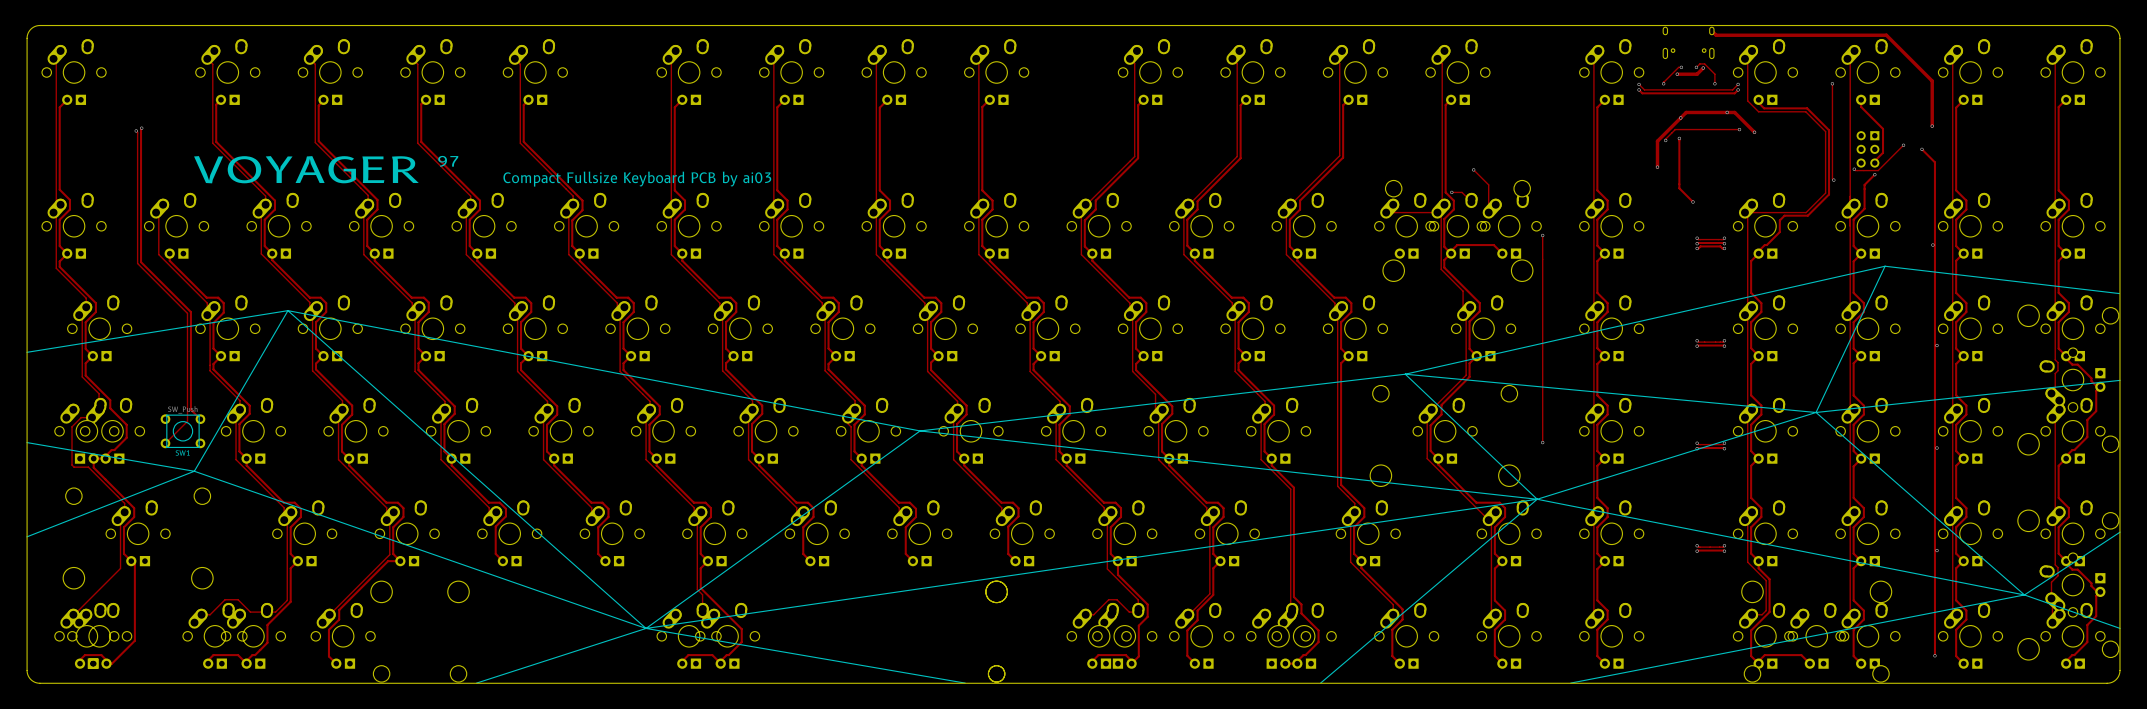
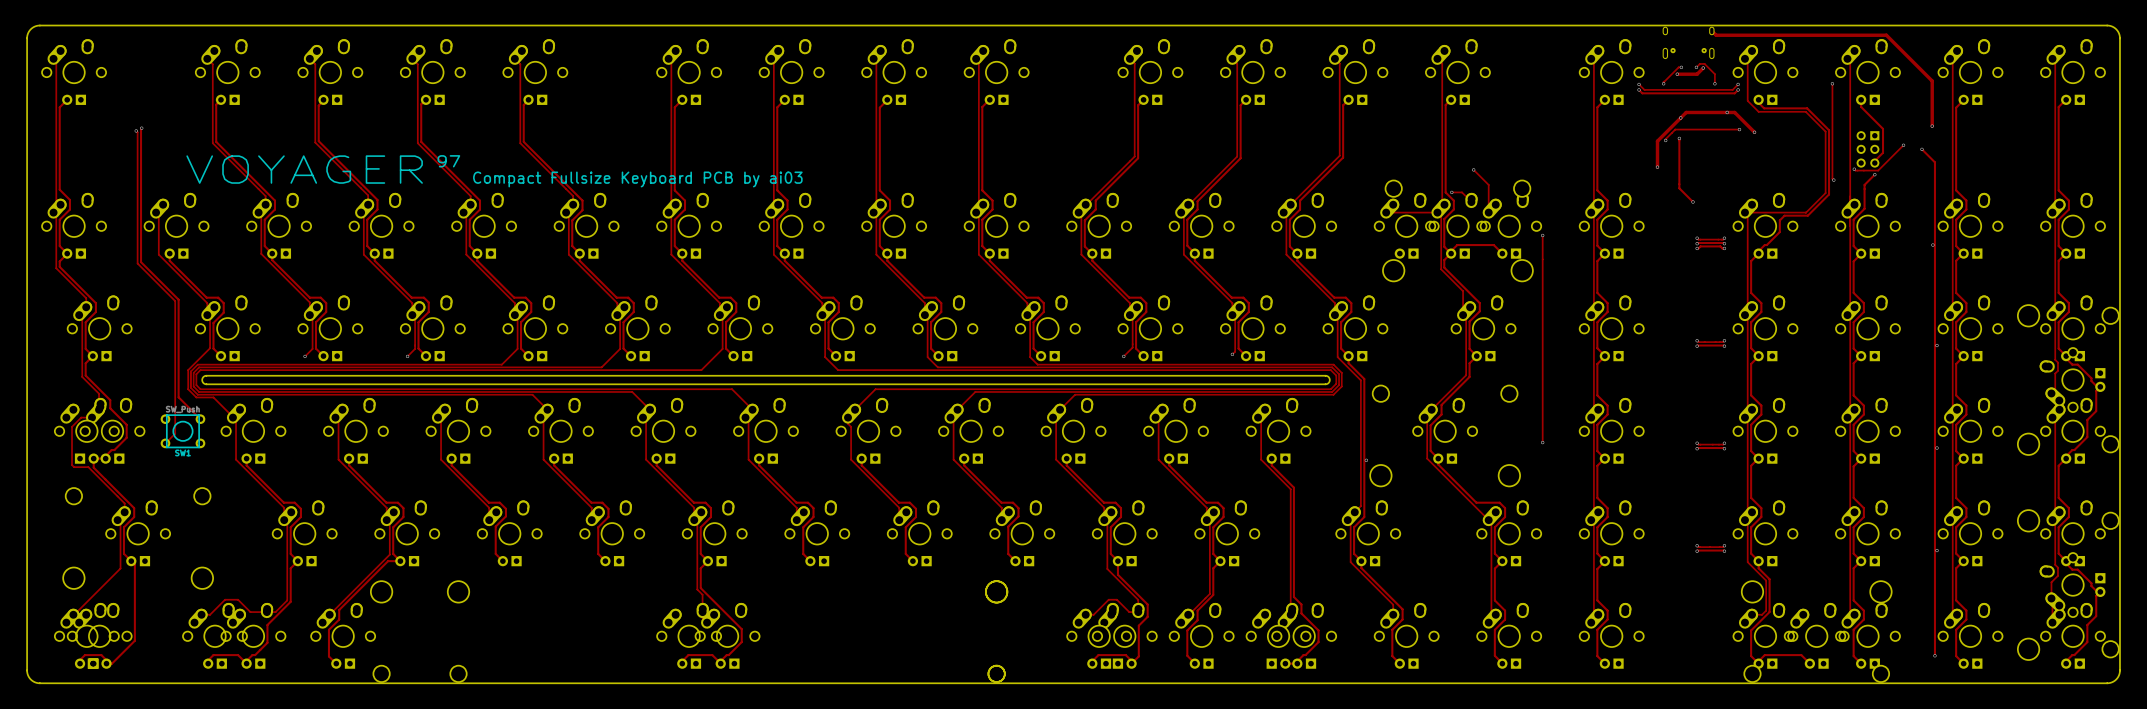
line: (1885, 266) (1816, 412) -> none
line: (1885, 266) (2119, 293) -> none
line: (1885, 266) (1405, 374) -> none
track: (178, 299) (190, 312) (190, 371) -> (178, 299) (178, 397) (200, 419)
track: (175, 301) (187, 313) (187, 421) (175, 433) -> (175, 301) (175, 433)
line: (287, 310) (920, 430) -> none
line: (287, 310) (646, 628) -> none
line: (287, 310) (194, 471) -> none
line: (287, 310) (26, 352) -> none
track: (1132, 347) (1132, 371) (1155, 394) (1155, 417) -> (1132, 347) (1123, 356)
track: (210, 348) (210, 370) (239, 400) (239, 409) -> (210, 348) (188, 370) (188, 389) (196, 397) (213, 397) (232, 417)
track: (312, 348) (312, 370) (342, 400) (342, 409) -> (312, 348) (305, 356)
track: (415, 348) (415, 371) (445, 401) (445, 409) -> (415, 348) (407, 356)
track: (517, 348) (517, 371) (547, 401) (547, 409) -> (190, 387) (197, 394) (532, 394) (547, 409)
track: none -> (517, 348) (501, 364) (197, 364) (190, 371)
track: (620, 348) (620, 371) (650, 401) (650, 409) -> (620, 348) (601, 367) (199, 367) (193, 372) (193, 386) (199, 391) (632, 391) (650, 409)
track: (722, 348) (722, 370) (752, 400) (752, 409) -> (722, 348) (701, 370) (200, 370) (196, 374) (196, 385) (200, 389) (732, 389) (752, 409)
track: (1235, 351) (1235, 371) (1265, 401) (1265, 409) -> (1235, 351) (1232, 354)
via: none -> (1232, 354)
track: (220, 356) (213, 363) (213, 369) (249, 405) (249, 413) (239, 424) (239, 451) (246, 458) -> none
via: none -> (305, 356)
track: (323, 356) (315, 363) (315, 369) (352, 405) (352, 414) (341, 424) (341, 451) (349, 458) -> none
via: none -> (407, 356)
track: (426, 356) (418, 363) (418, 370) (454, 406) (454, 413) (444, 424) (444, 451) (451, 458) -> none
track: (528, 356) (521, 363) (521, 370) (557, 406) (557, 414) (546, 424) (546, 451) (554, 458) -> none
track: (631, 356) (623, 363) (623, 370) (659, 406) (659, 414) (649, 424) (649, 451) (656, 458) -> none
track: (733, 356) (726, 363) (726, 369) (762, 405) (762, 413) (751, 424) (751, 451) (759, 458) -> none
track: (836, 356) (828, 363) (828, 369) (864, 405) (864, 414) (854, 424) (854, 451) (861, 458) -> none
track: (938, 356) (931, 362) (931, 370) (966, 405) (966, 414) (957, 424) (957, 451) (964, 458) -> none
track: (1041, 356) (1033, 363) (1033, 370) (1069, 406) (1069, 414) (1059, 424) (1059, 451) (1066, 458) -> none
via: none -> (1123, 356)
track: (1143, 356) (1136, 363) (1136, 370) (1172, 406) (1172, 413) (1162, 424) (1162, 451) (1169, 458) -> none
track: (1246, 356) (1238, 363) (1238, 370) (1274, 405) (1274, 414) (1264, 424) (1264, 451) (1271, 458) -> none
track: (1348, 356) (1341, 363) (1341, 484) (1364, 508) -> (1348, 356) (1348, 363) (1364, 379) (1364, 508)
track: (825, 357) (825, 370) (855, 400) (855, 409) -> (825, 357) (838, 370) (1330, 370) (1336, 375) (1336, 383) (1330, 389) (875, 389) (855, 409)
track: (927, 357) (927, 371) (957, 401) (957, 409) -> (927, 357) (937, 367) (1332, 367) (1339, 374) (1339, 385) (1332, 391) (975, 391) (957, 409)
track: (1030, 357) (1030, 371) (1060, 401) (1060, 409) -> (1030, 357) (1037, 364) (1333, 364) (1341, 372) (1341, 386) (1333, 394) (1075, 394) (1060, 409)
track: (1337, 357) (1337, 486) (1354, 503) (1354, 512) -> (1337, 357) (1360, 380) (1360, 506) (1354, 512)
line: (1405, 374) (1816, 412) -> none
line: (1405, 374) (1537, 499) -> none
line: (1405, 374) (920, 430) -> none
board edge: none -> (206, 375) (1325, 375) (1329, 380) (1325, 384) (206, 384) (202, 380) (206, 375)
line: (2120, 380) (1816, 412) -> none
track: (190, 387) (190, 409) (200, 419) -> none
line: (1816, 412) (2024, 594) -> none
line: (1816, 412) (1537, 499) -> none
line: (920, 430) (1537, 499) -> none
line: (920, 430) (646, 628) -> none
line: (26, 442) (194, 471) -> none
via: none -> (1366, 460)
line: (194, 471) (646, 628) -> none
line: (194, 471) (26, 536) -> none
line: (1537, 499) (2024, 594) -> none
line: (1537, 499) (1320, 683) -> none
line: (1537, 499) (646, 628) -> none
line: (2120, 532) (2024, 594) -> none
line: (2024, 594) (2120, 628) -> none
line: (2024, 594) (1570, 683) -> none
line: (646, 628) (965, 683) -> none
line: (646, 628) (476, 683) -> none

